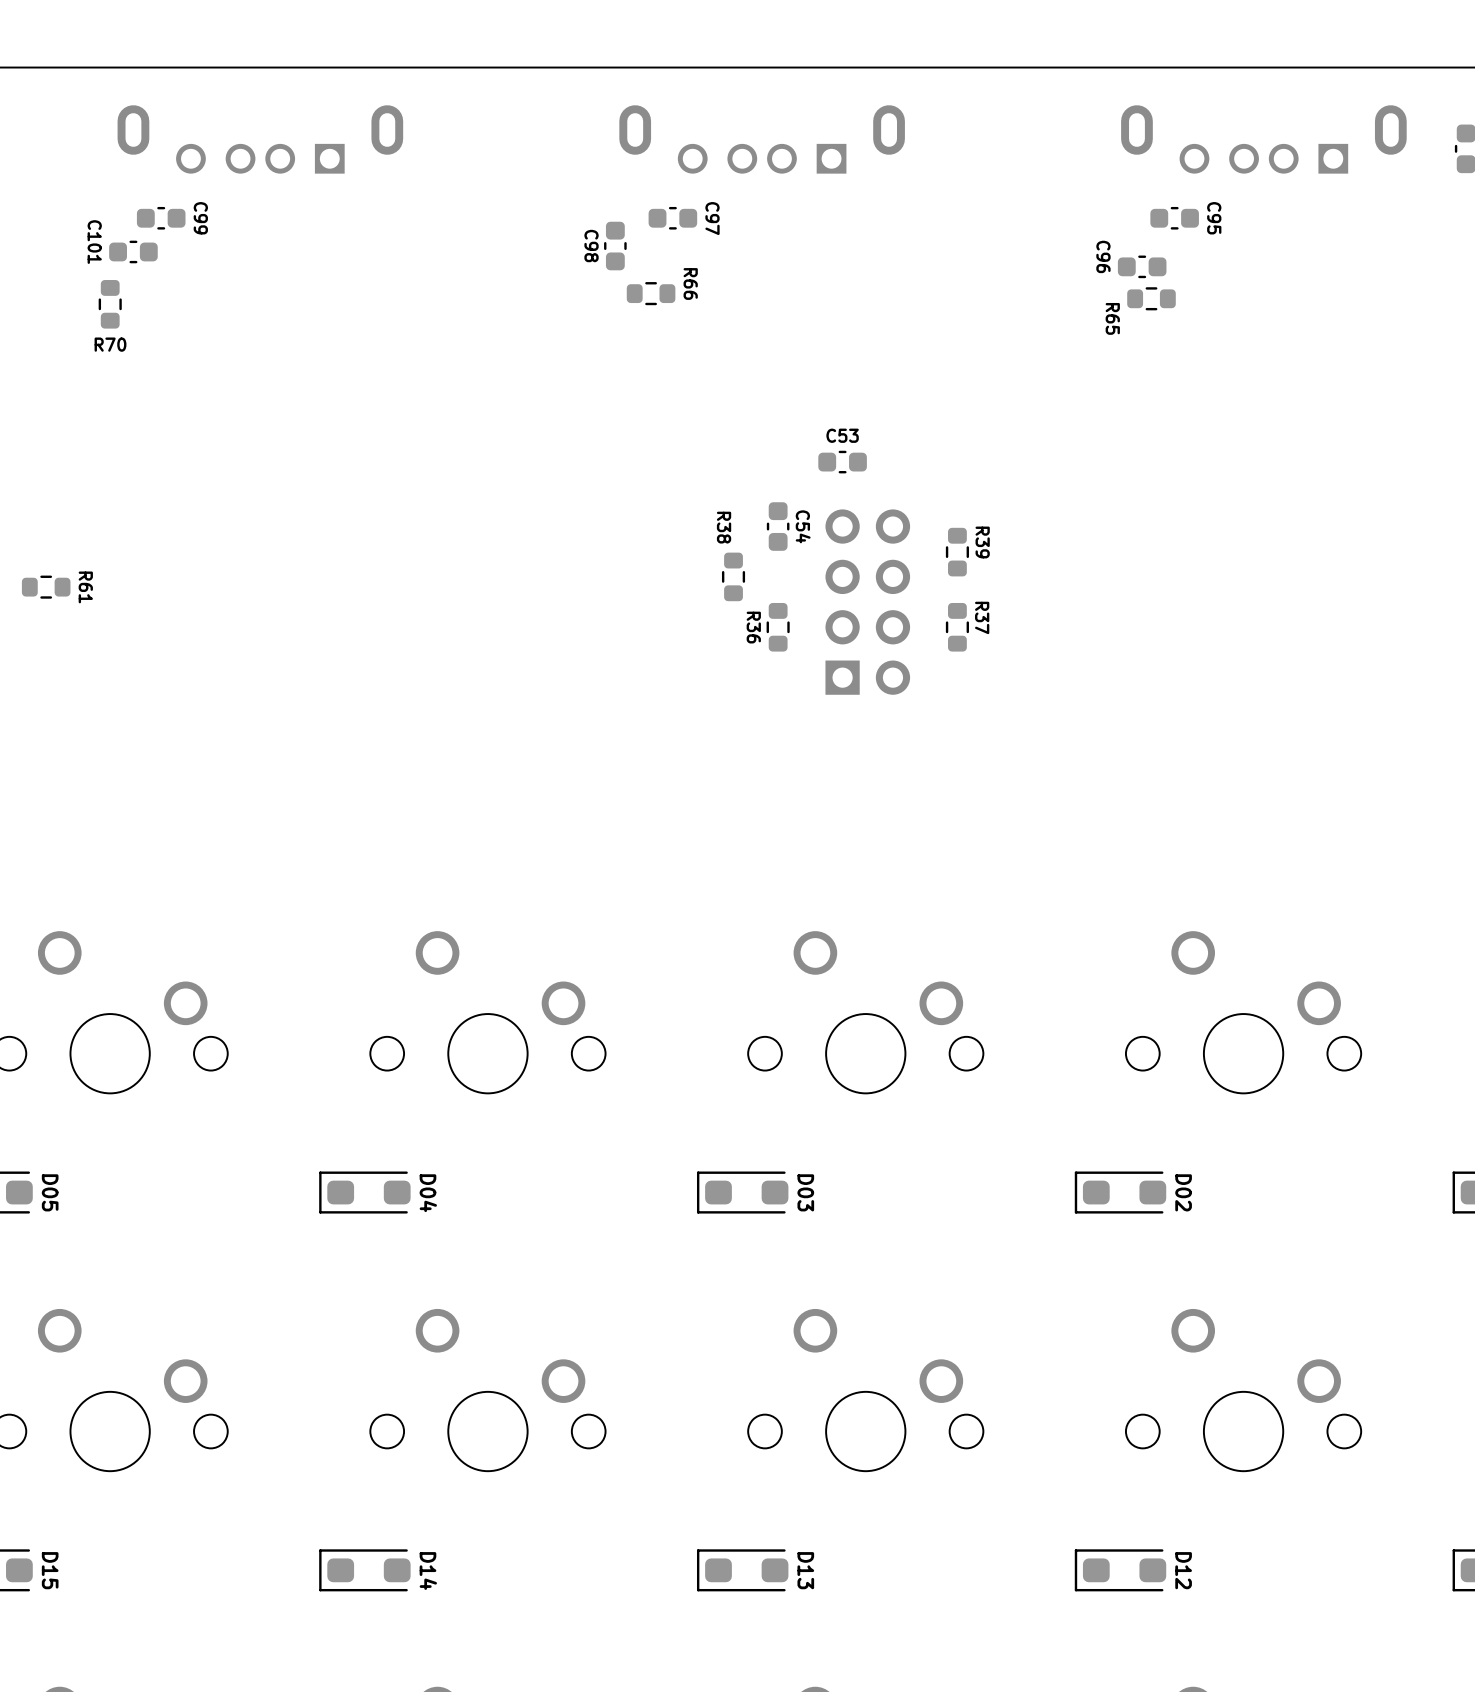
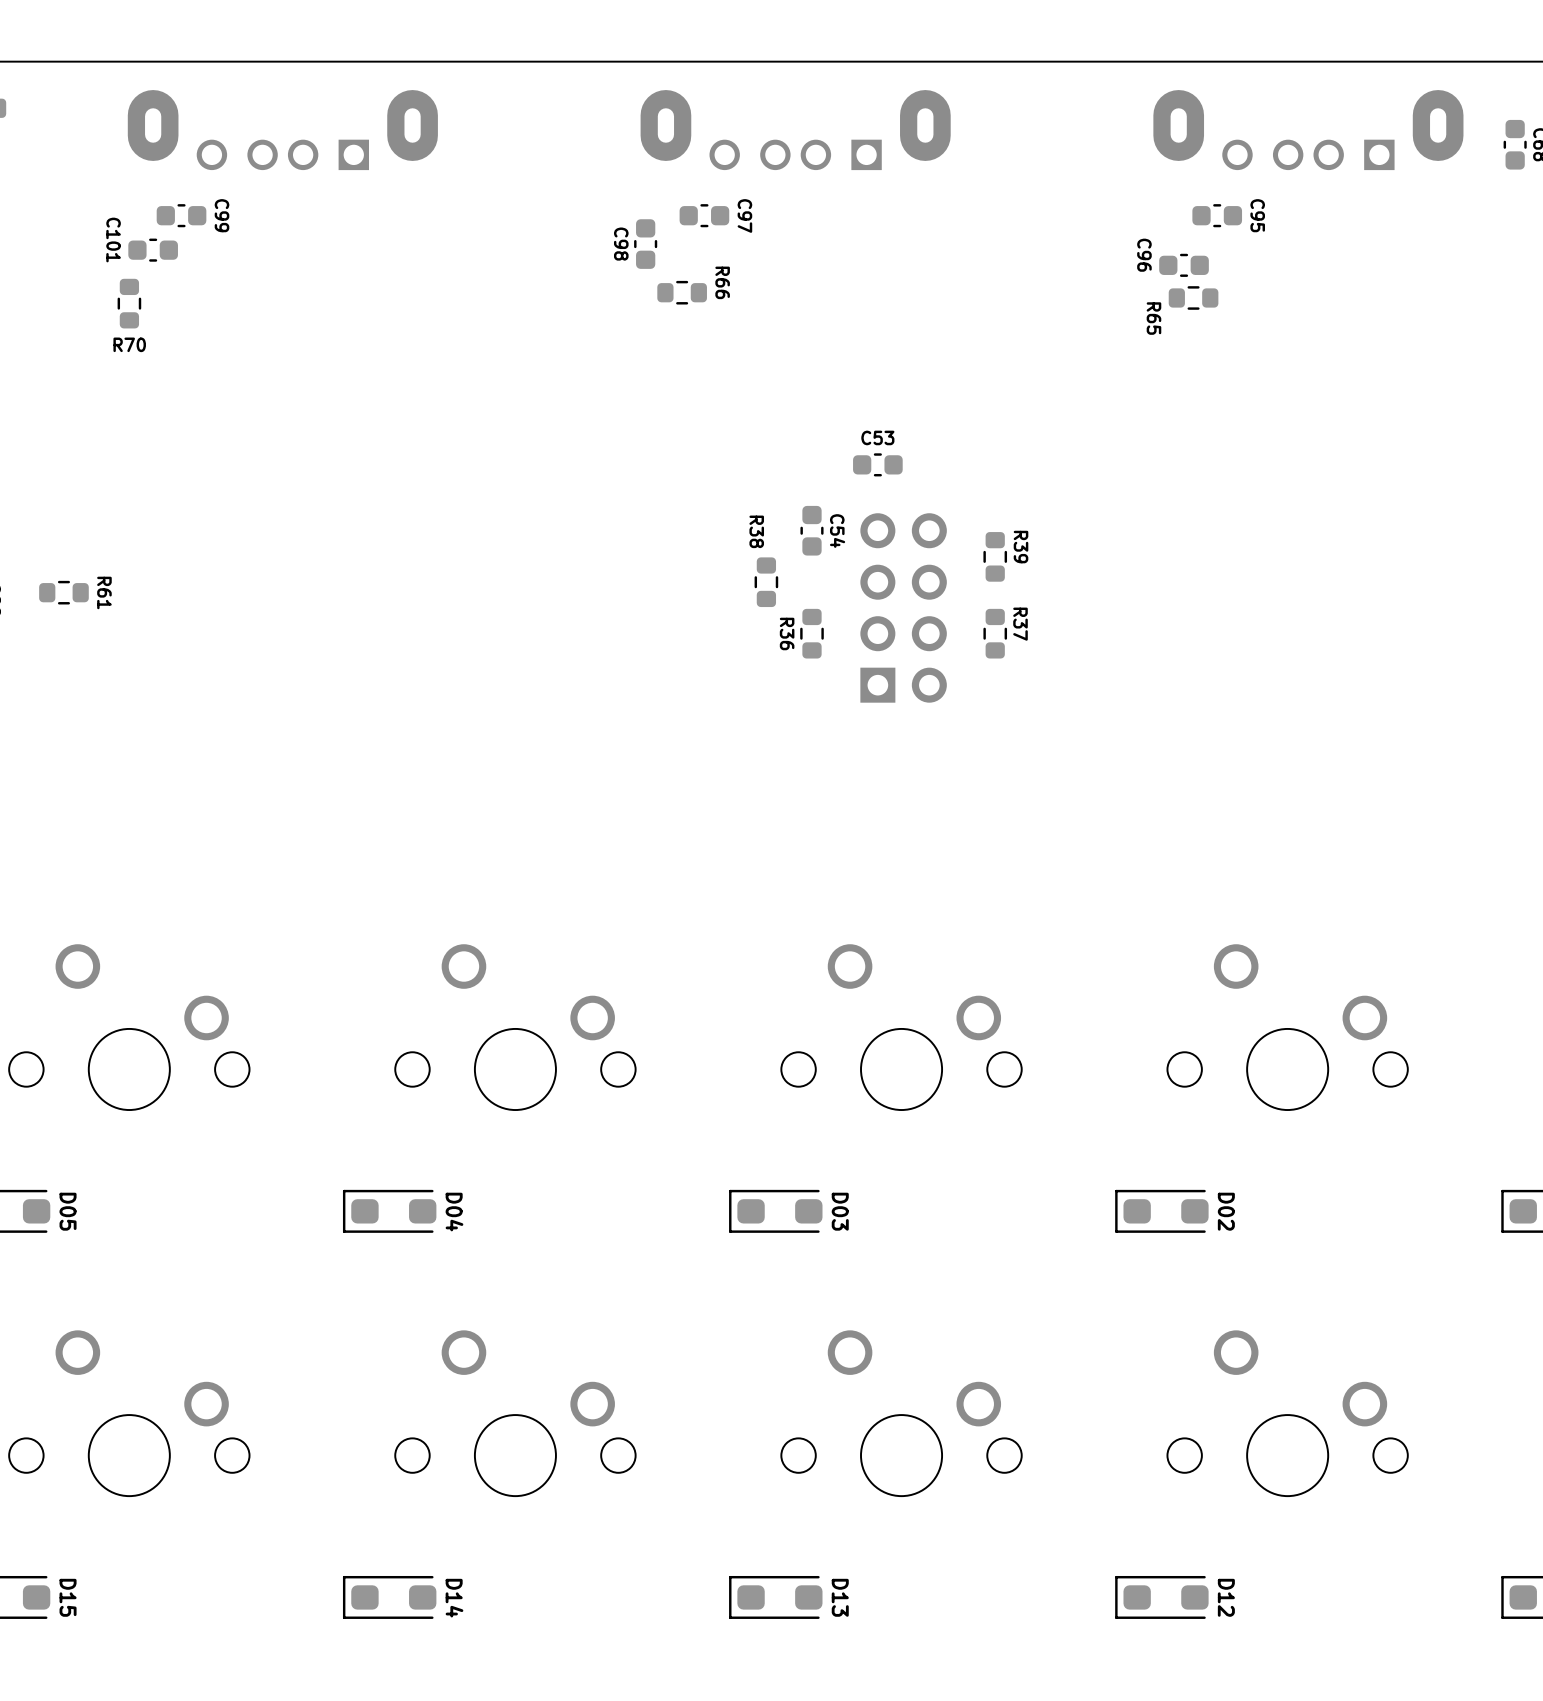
part footprint: [117, 105, 404, 174] -> [127, 90, 438, 171]
part footprint: [619, 105, 905, 174] -> [640, 90, 951, 171]
part footprint: [1121, 105, 1407, 174] -> [1153, 90, 1464, 171]

